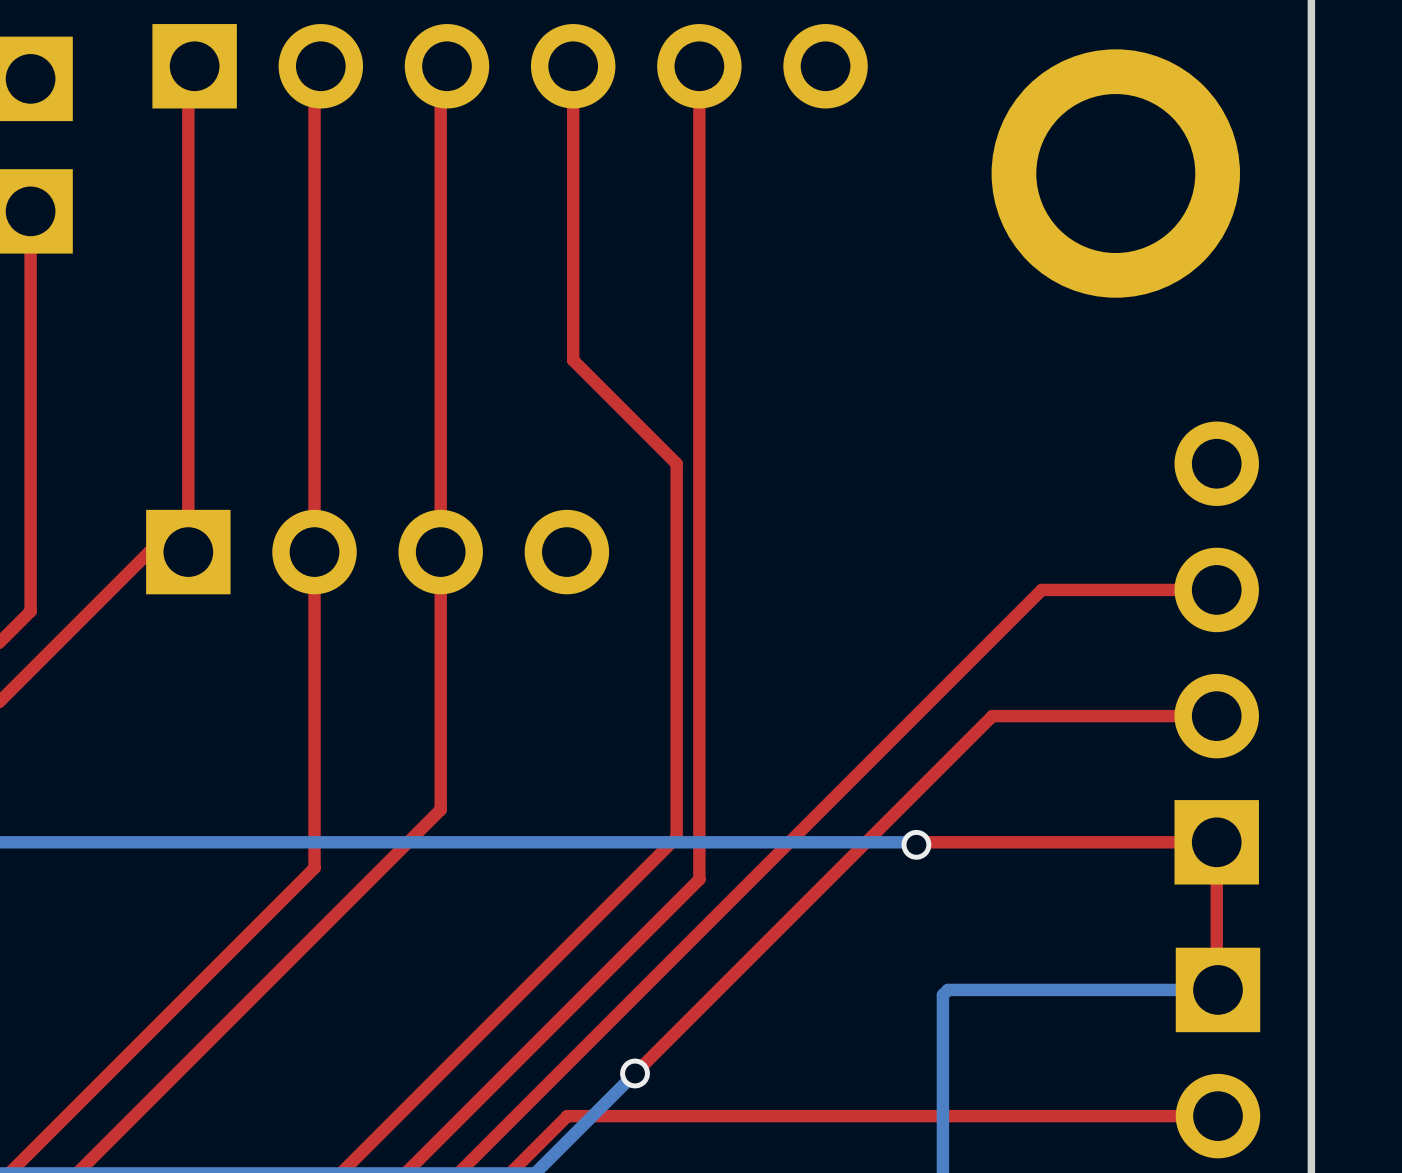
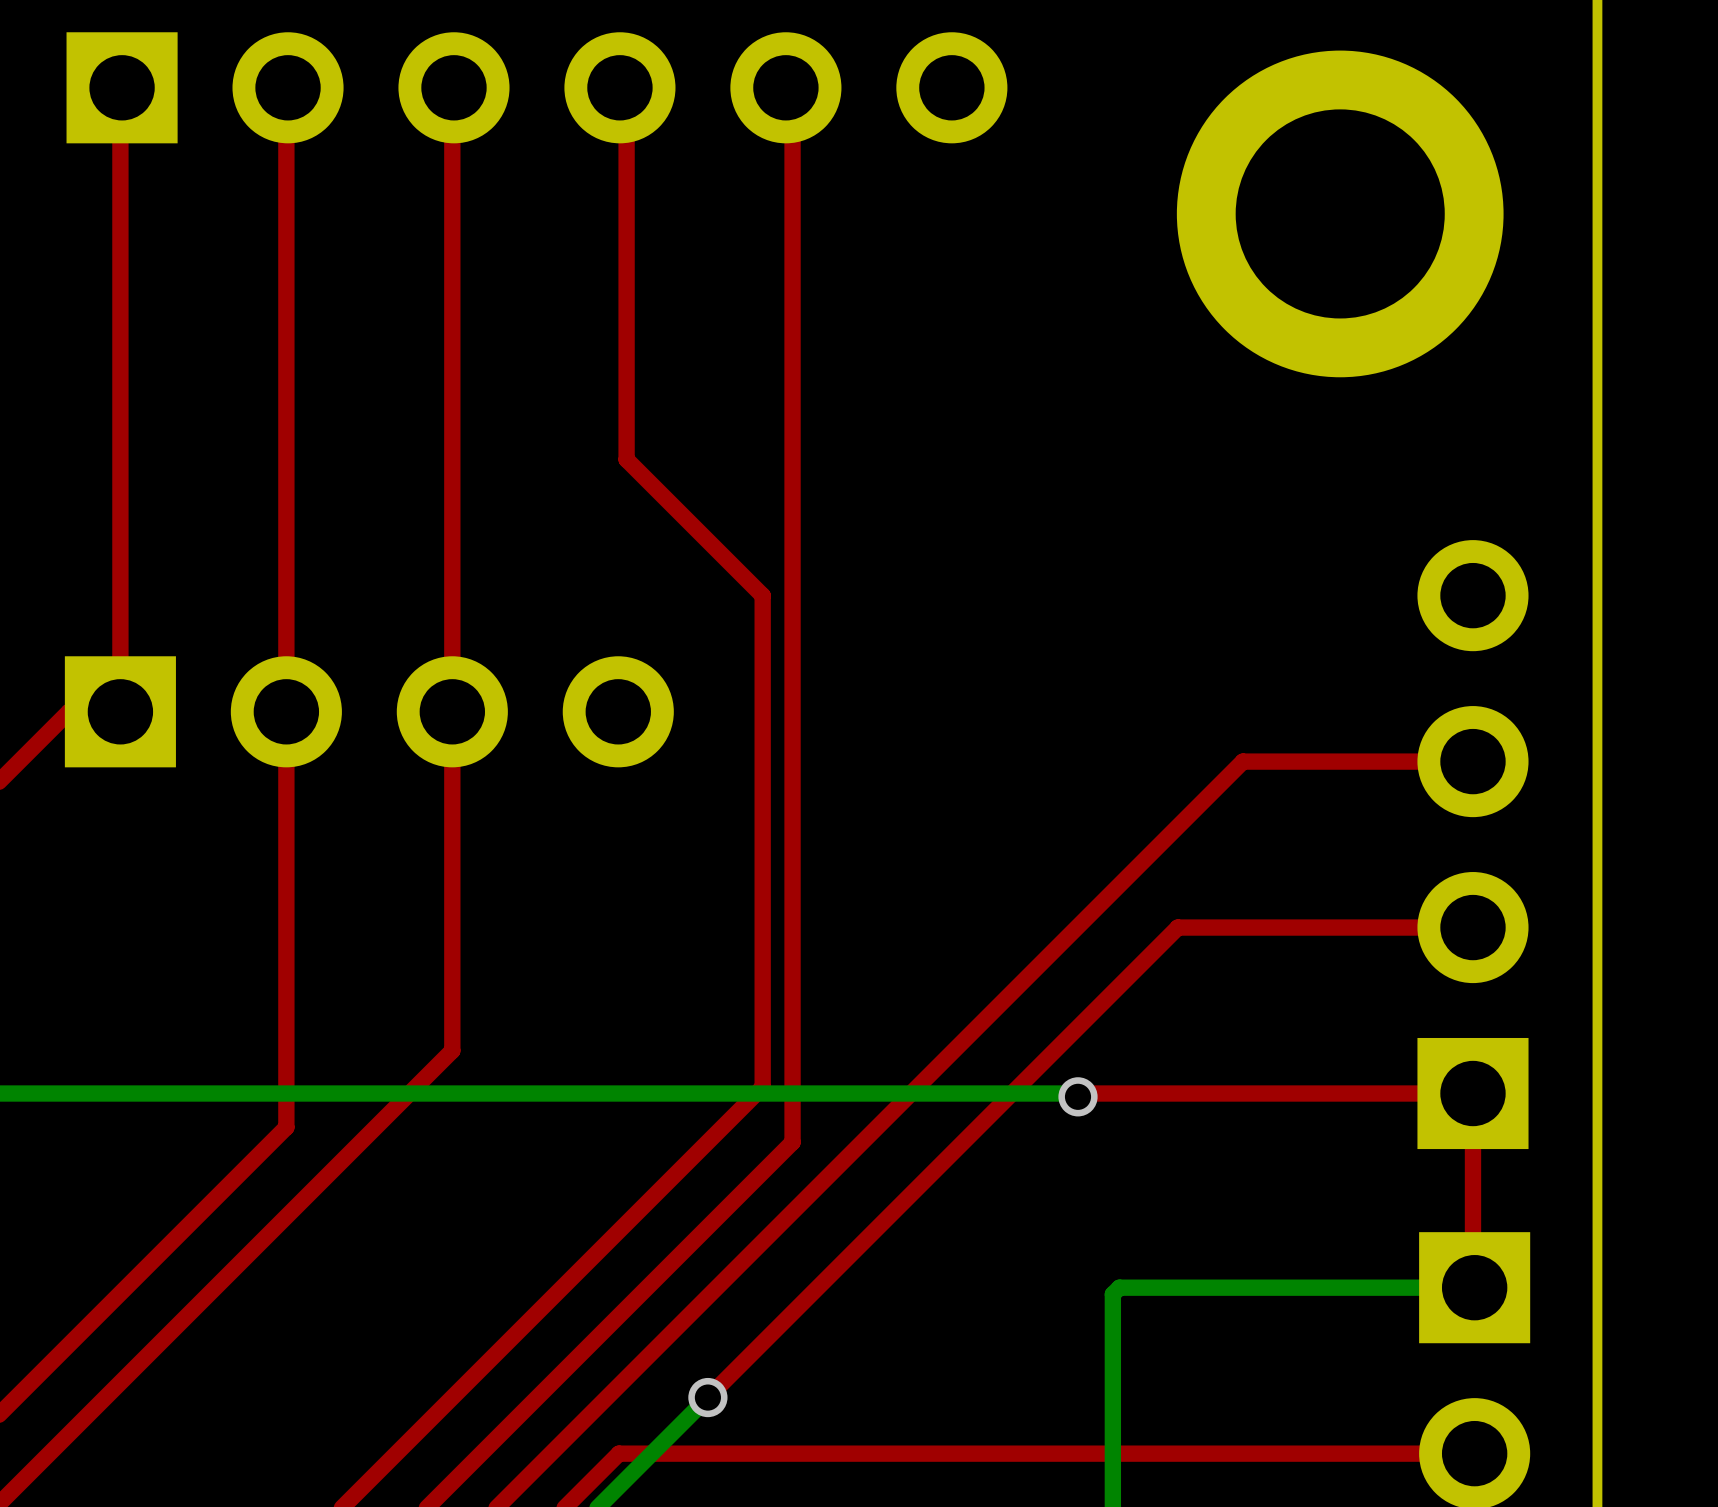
part position: (510, 66) -> (536, 87)

